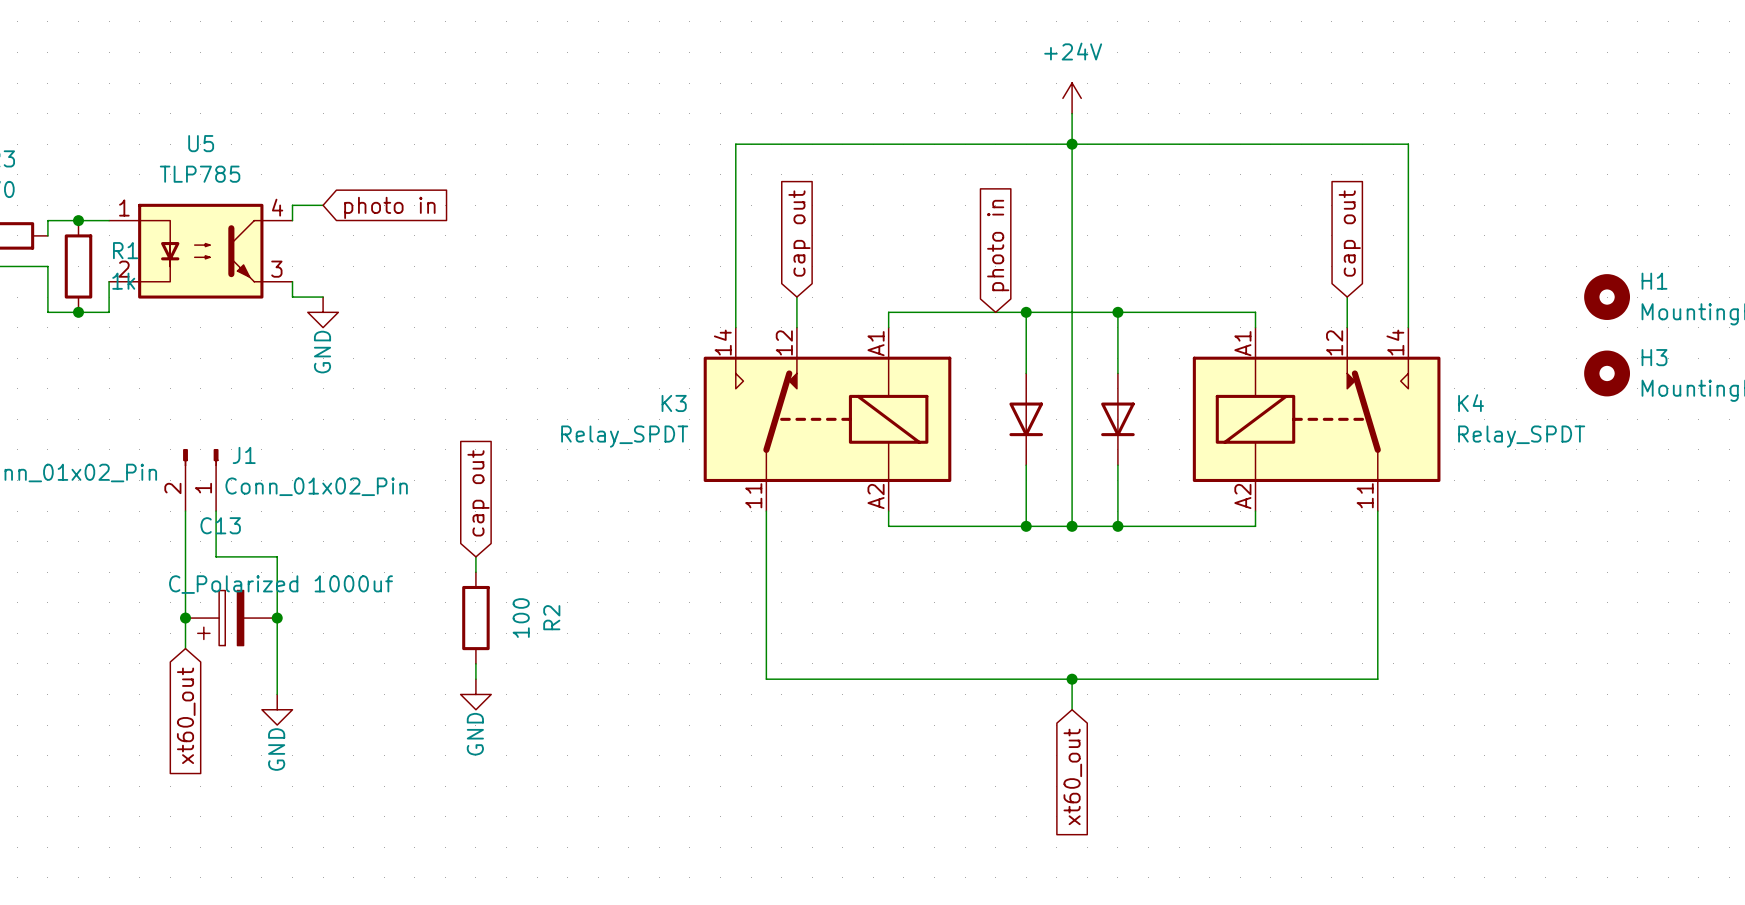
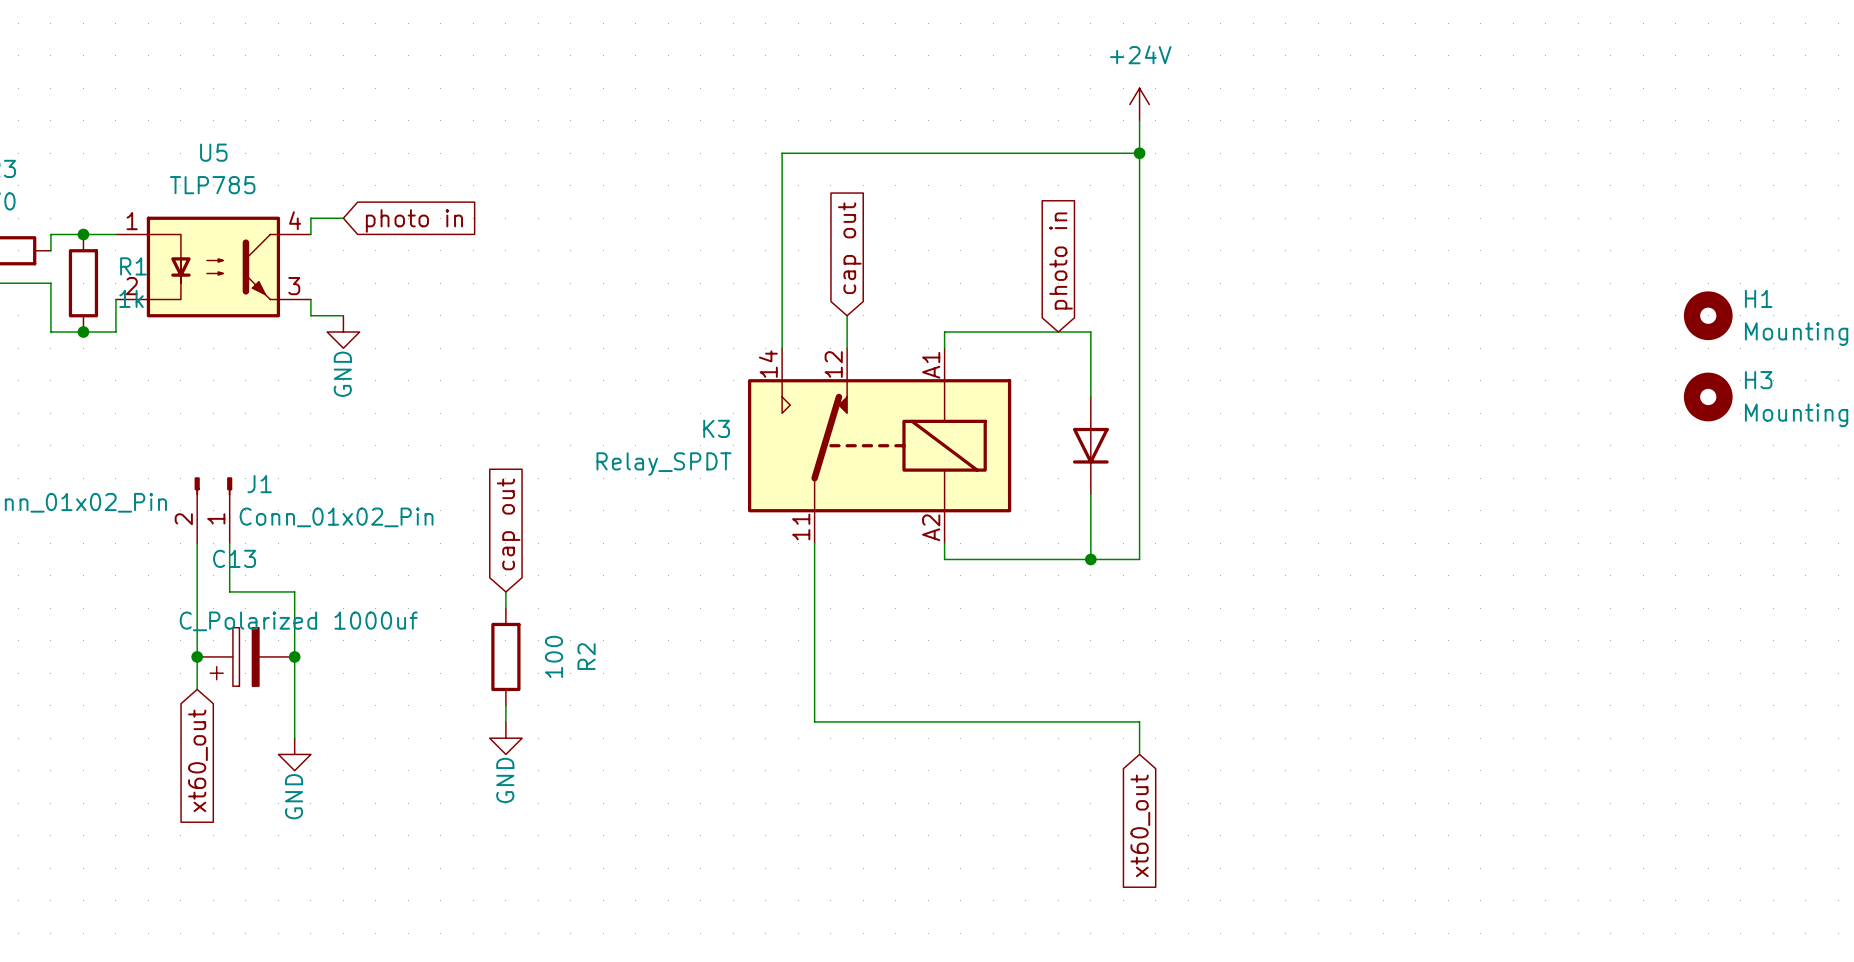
wire: (1072, 144) (1408, 144) (1408, 327) -> none
global label: cap out (1349, 233) -> none
wire: (1347, 297) (1347, 327) -> none
wire: (1026, 312) (1255, 312) (1255, 327) -> none
junction: (1026, 312) -> none
wire: (1117, 312) (1117, 373) -> none
junction: (1117, 312) -> none
part: (1117, 419) -> none
K4: Relay_SPDT (1316, 419) -> none
wire: (1117, 465) (1117, 526) -> none
wire: (1255, 511) (1255, 526) (1072, 526) -> none
wire: (1377, 511) (1377, 679) (1072, 679) -> none
junction: (1072, 526) -> none
junction: (1117, 526) -> none
junction: (1072, 679) -> none

